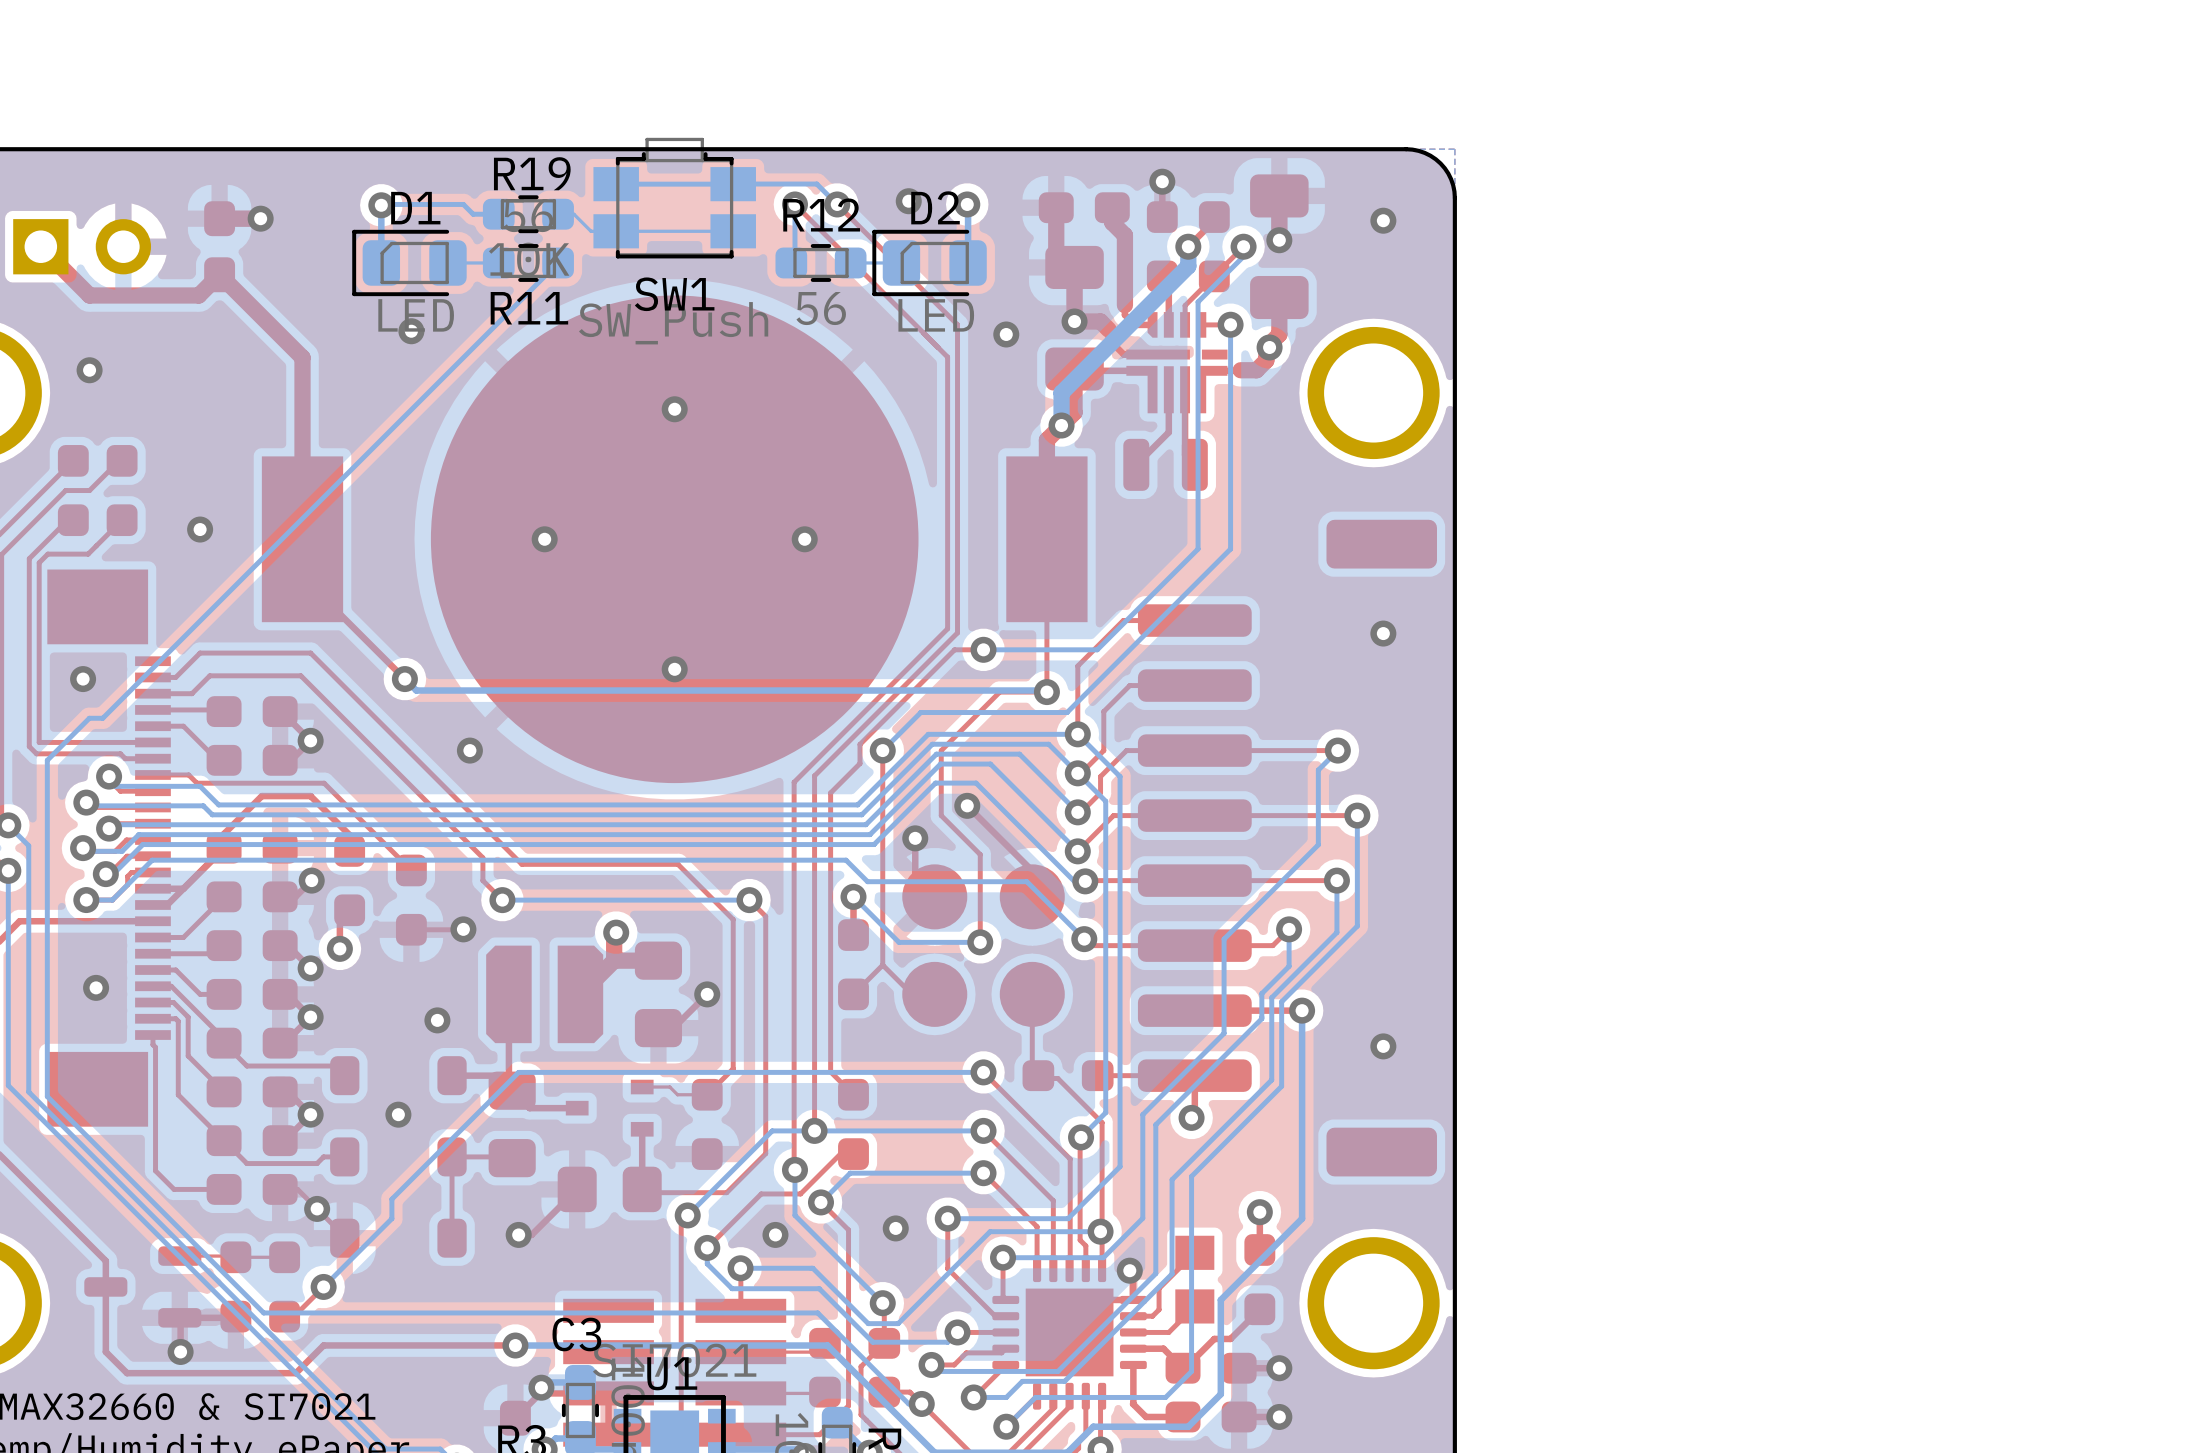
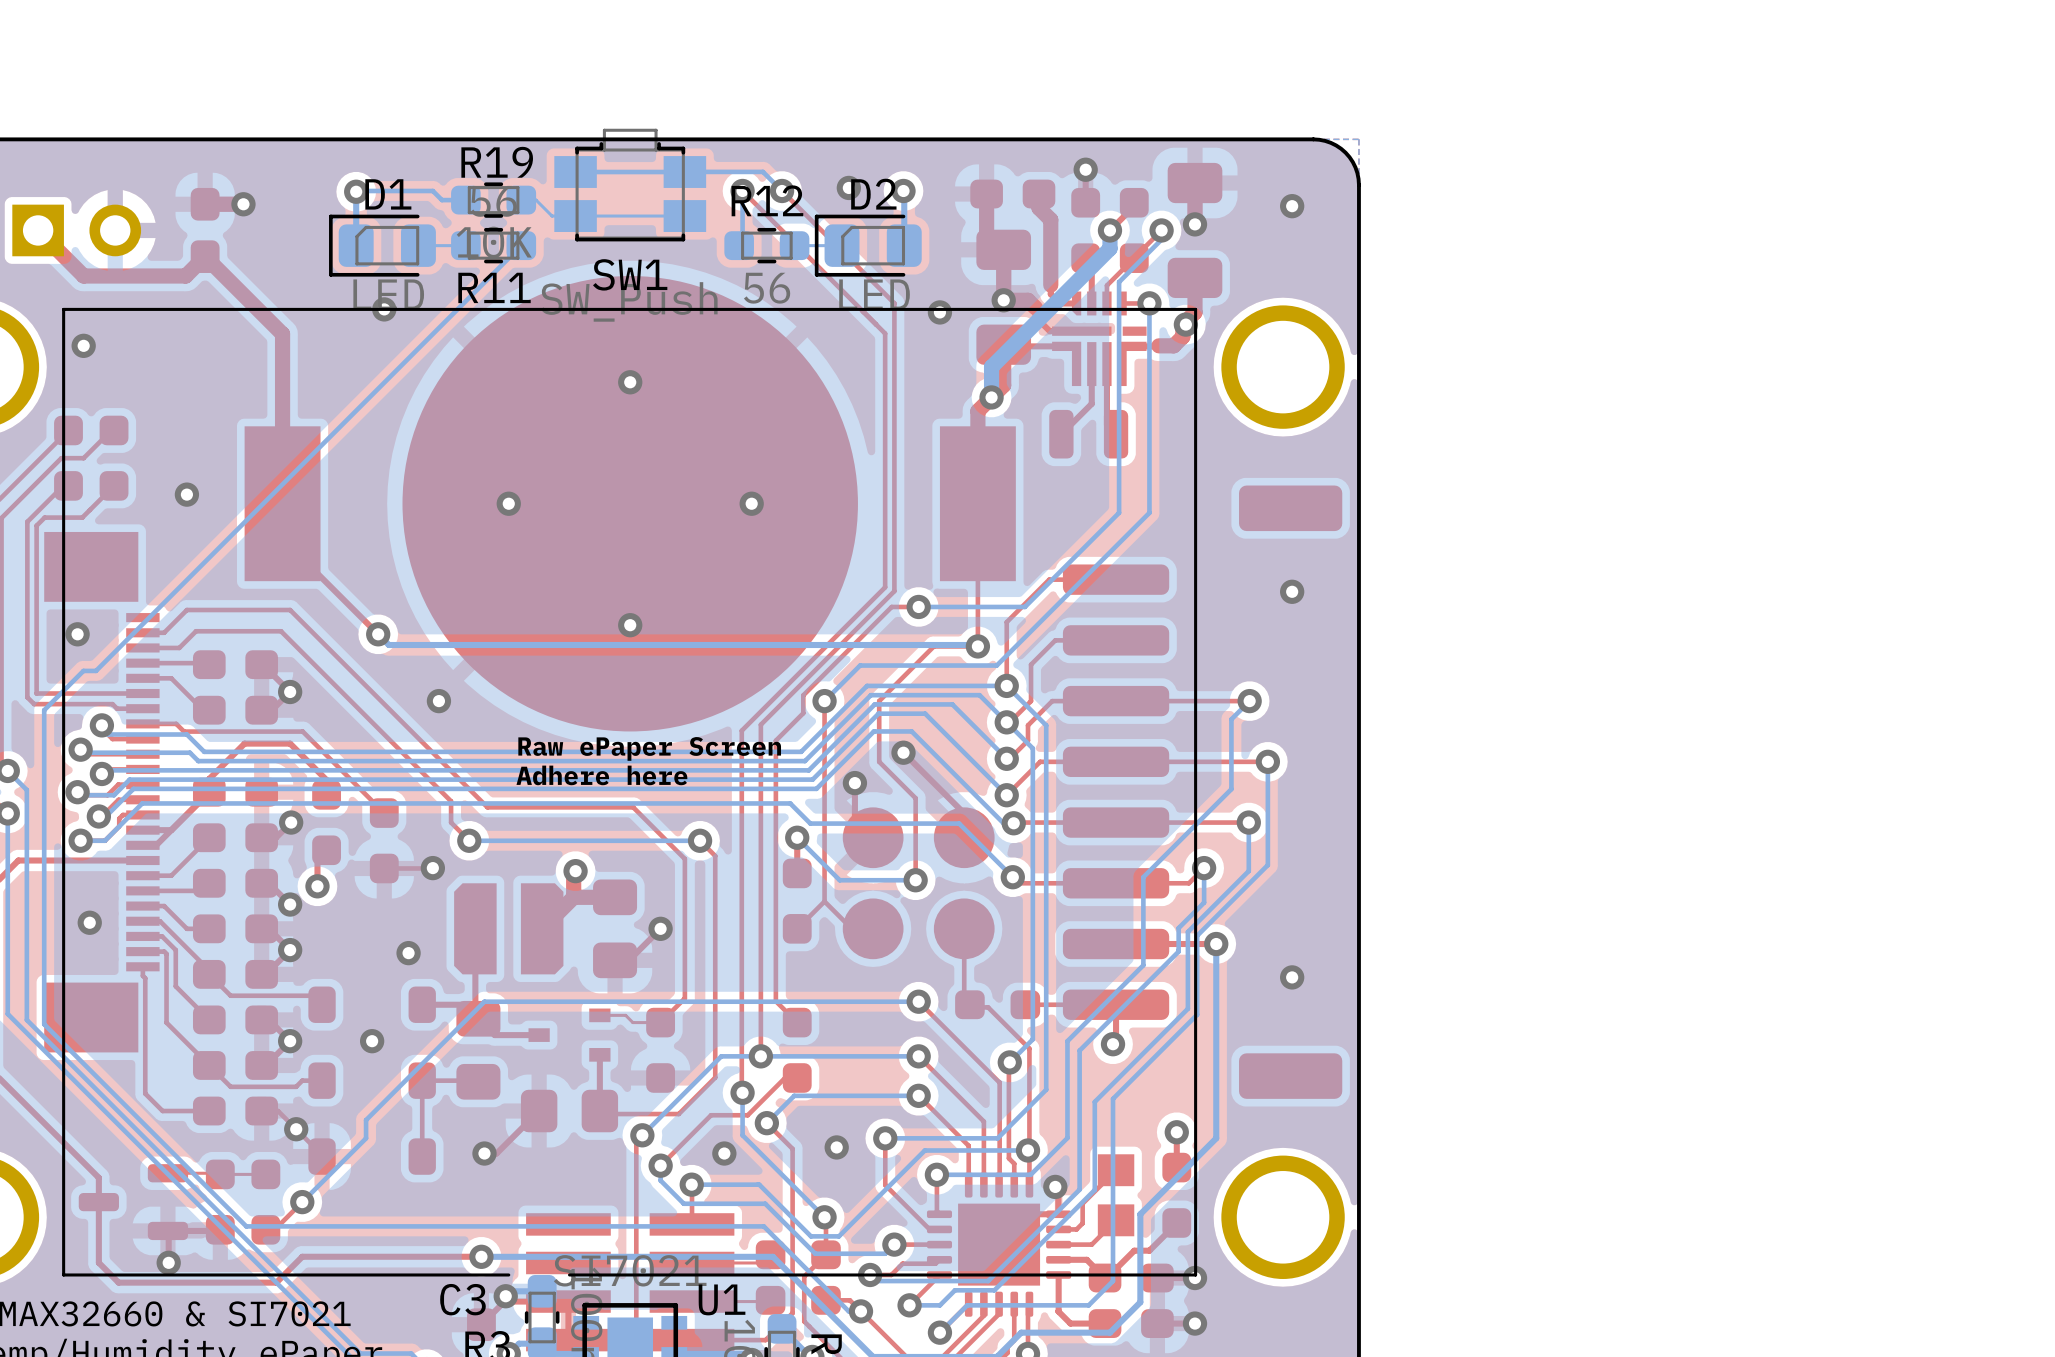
text: none -> Raw ePaper Screen (649, 748)
text: none -> Adhere here (601, 775)
C3 name position: C3 (576, 1334) -> C3 (462, 1299)
line: none -> (569, 1274) (1195, 1274) (1195, 309) (63, 309) (63, 1274) (508, 1274)
U1 name position: U1 (672, 1373) -> U1 (722, 1299)

